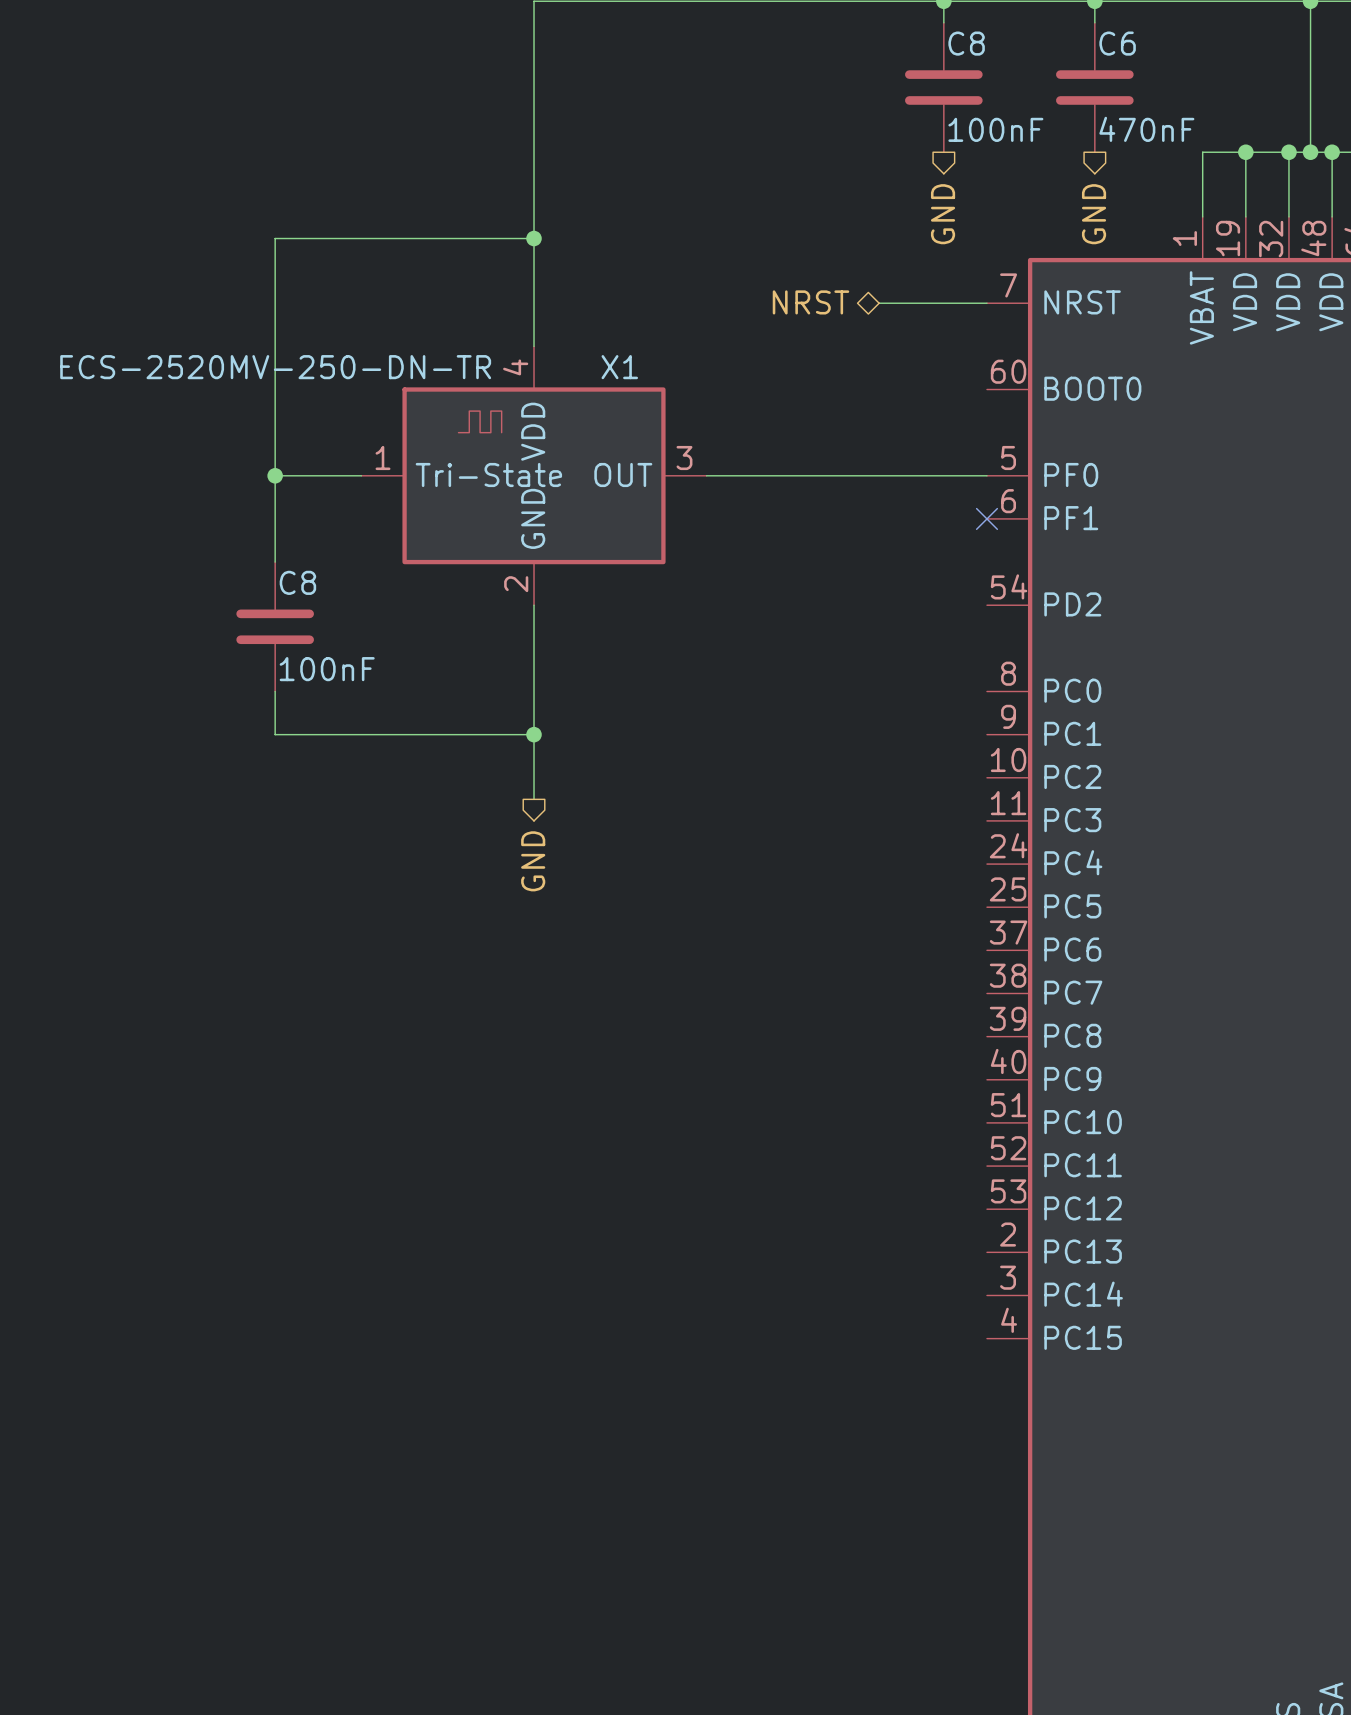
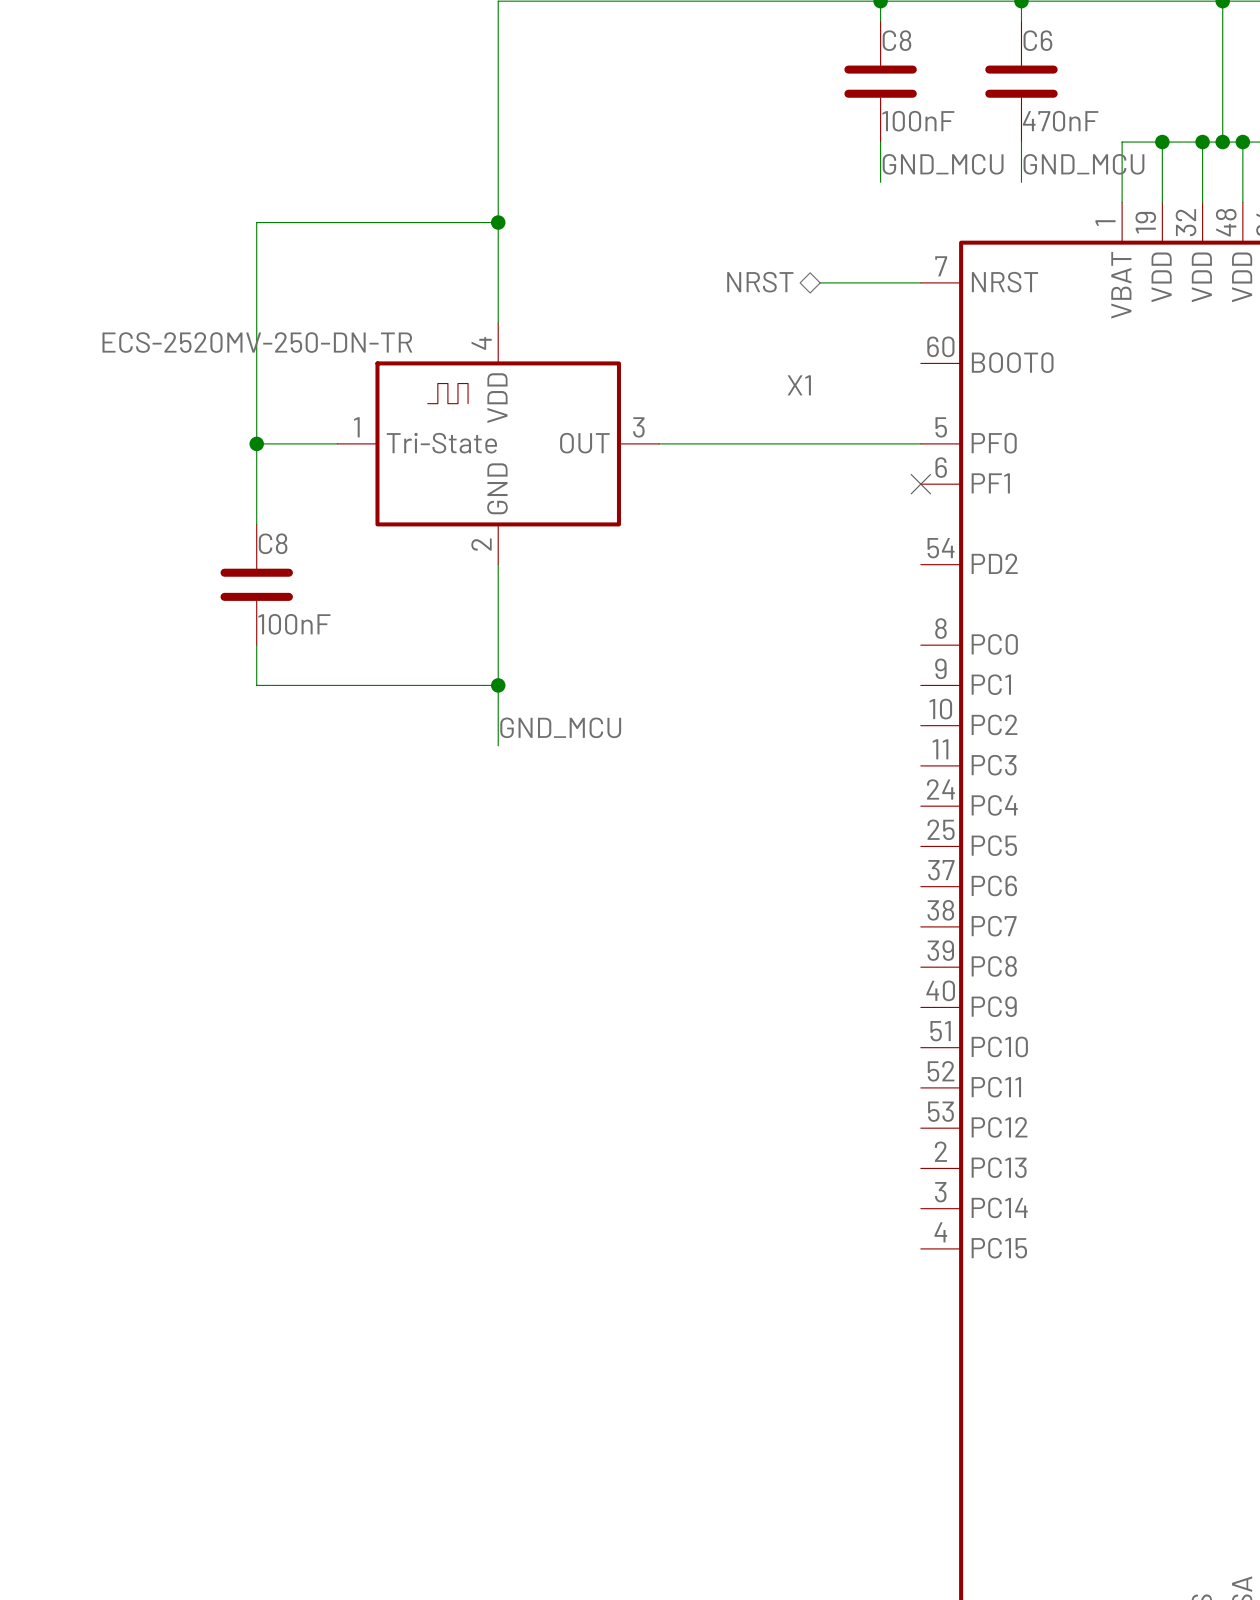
wire: none -> (880, 142) (880, 182)
wire: none -> (1021, 142) (1021, 182)
label: none -> GND_MCU (943, 164)
label: none -> GND_MCU (1083, 164)
hierarchical label: GND (943, 214) -> none
hierarchical label: GND (1094, 214) -> none
X1 name position: X1 (619, 367) -> X1 (799, 385)
label: none -> GND_MCU (560, 727)
hierarchical label: GND (533, 861) -> none

